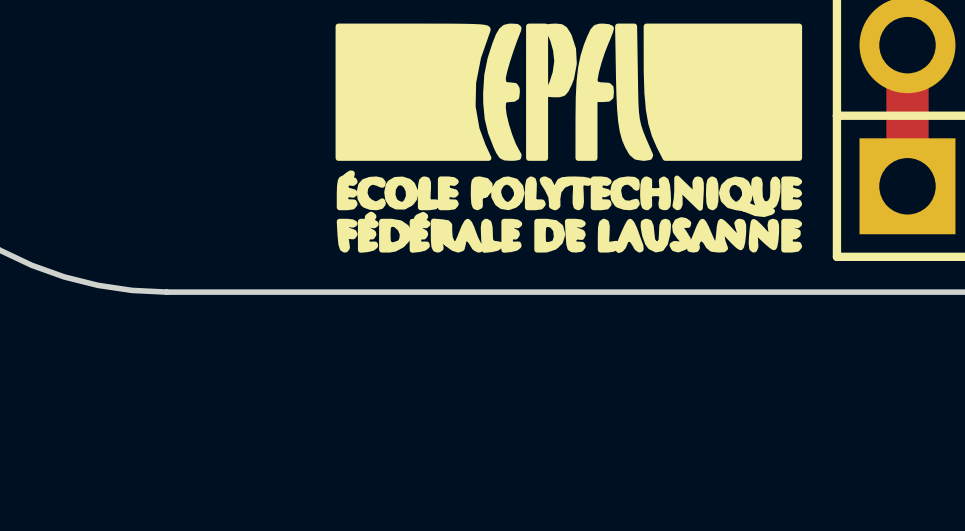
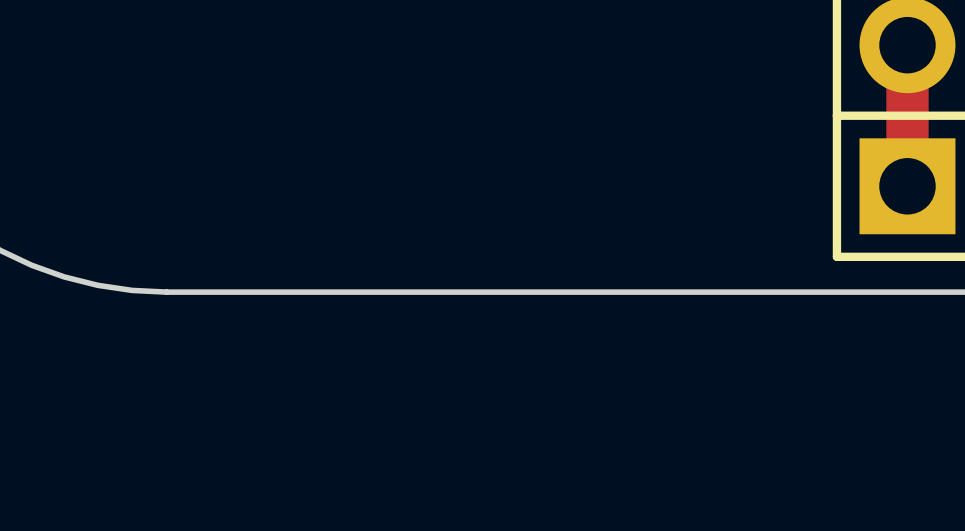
drawing: [335, 23, 803, 253] -> none

